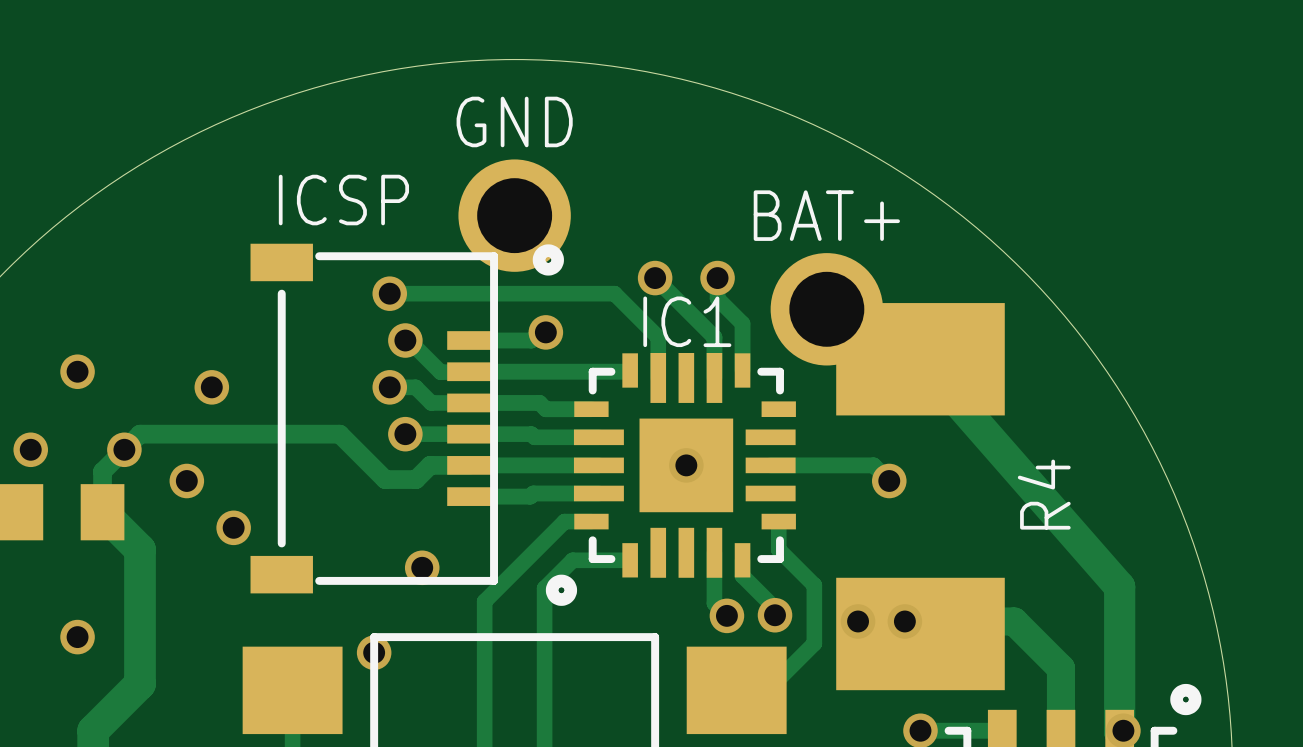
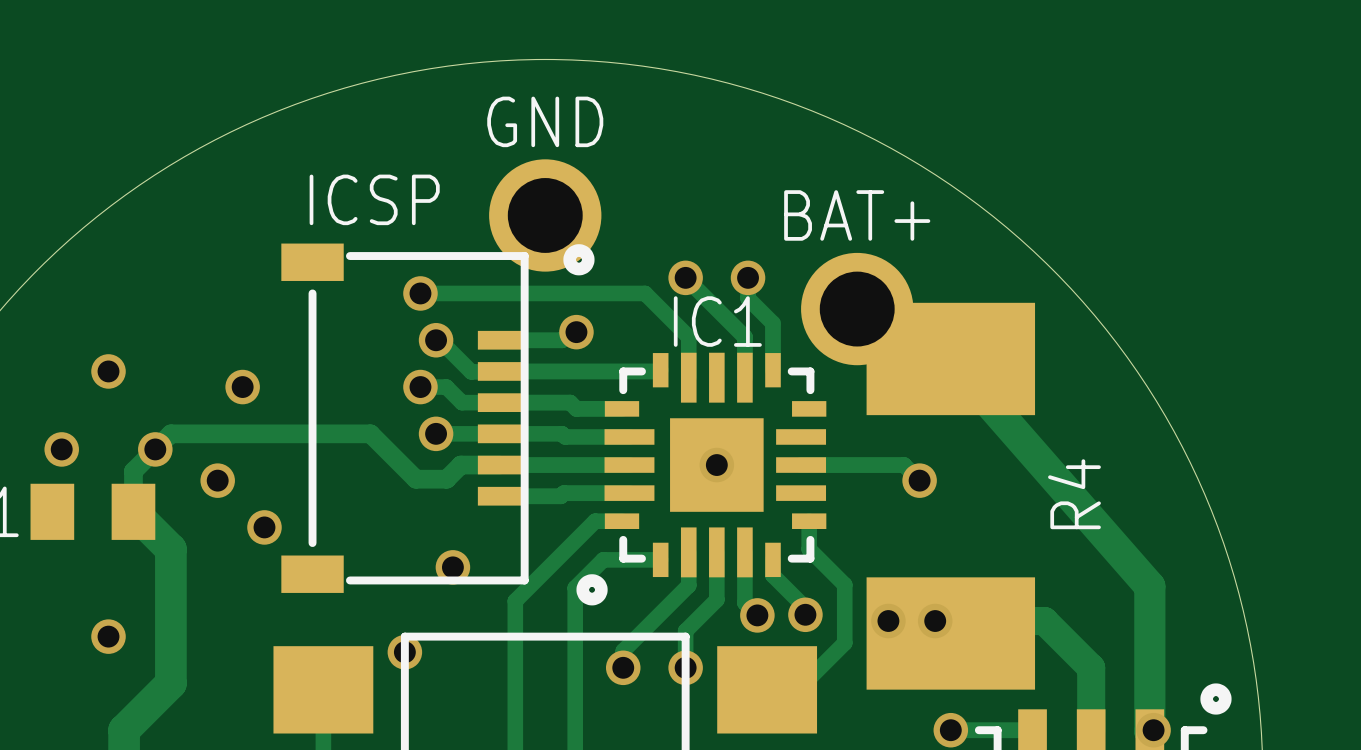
track: none -> (688, 552) (688, 585) (623, 650) (623, 667)
track: none -> (716, 552) (716, 599) (685, 631) (685, 667)
via: none -> (623, 667)
via: none -> (685, 667)

